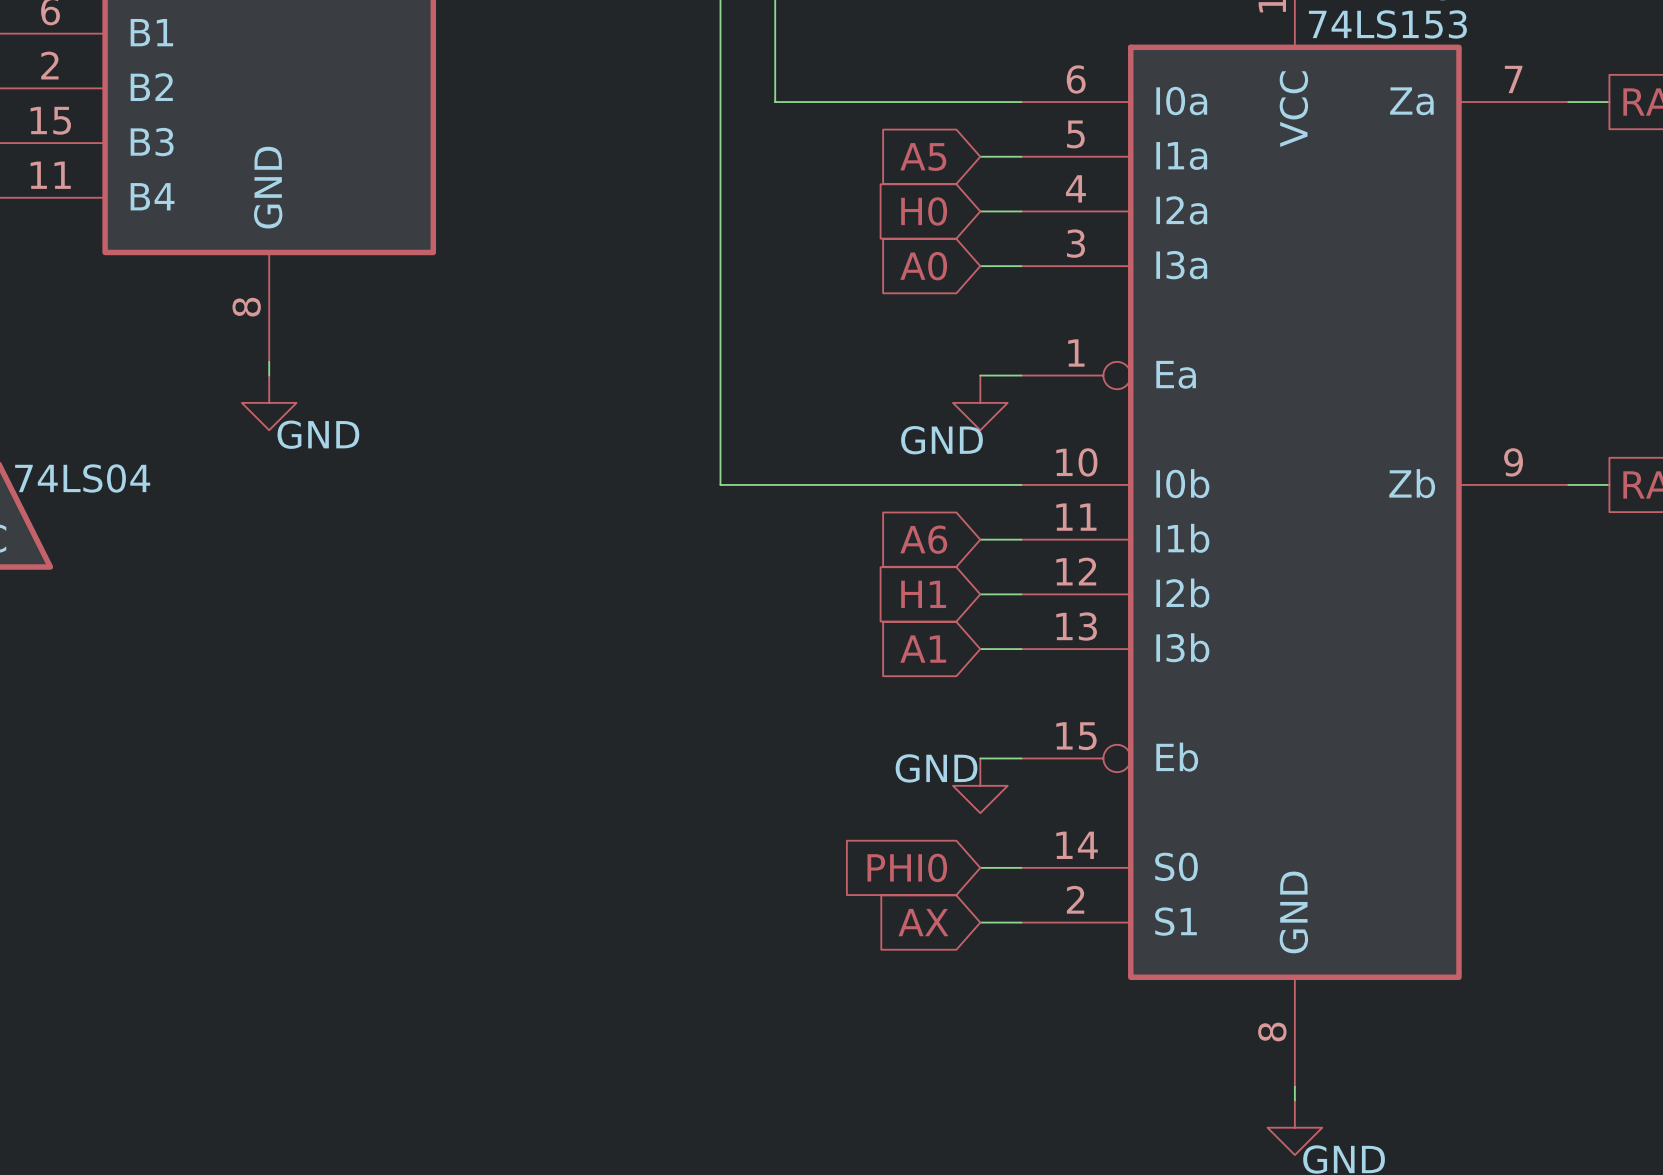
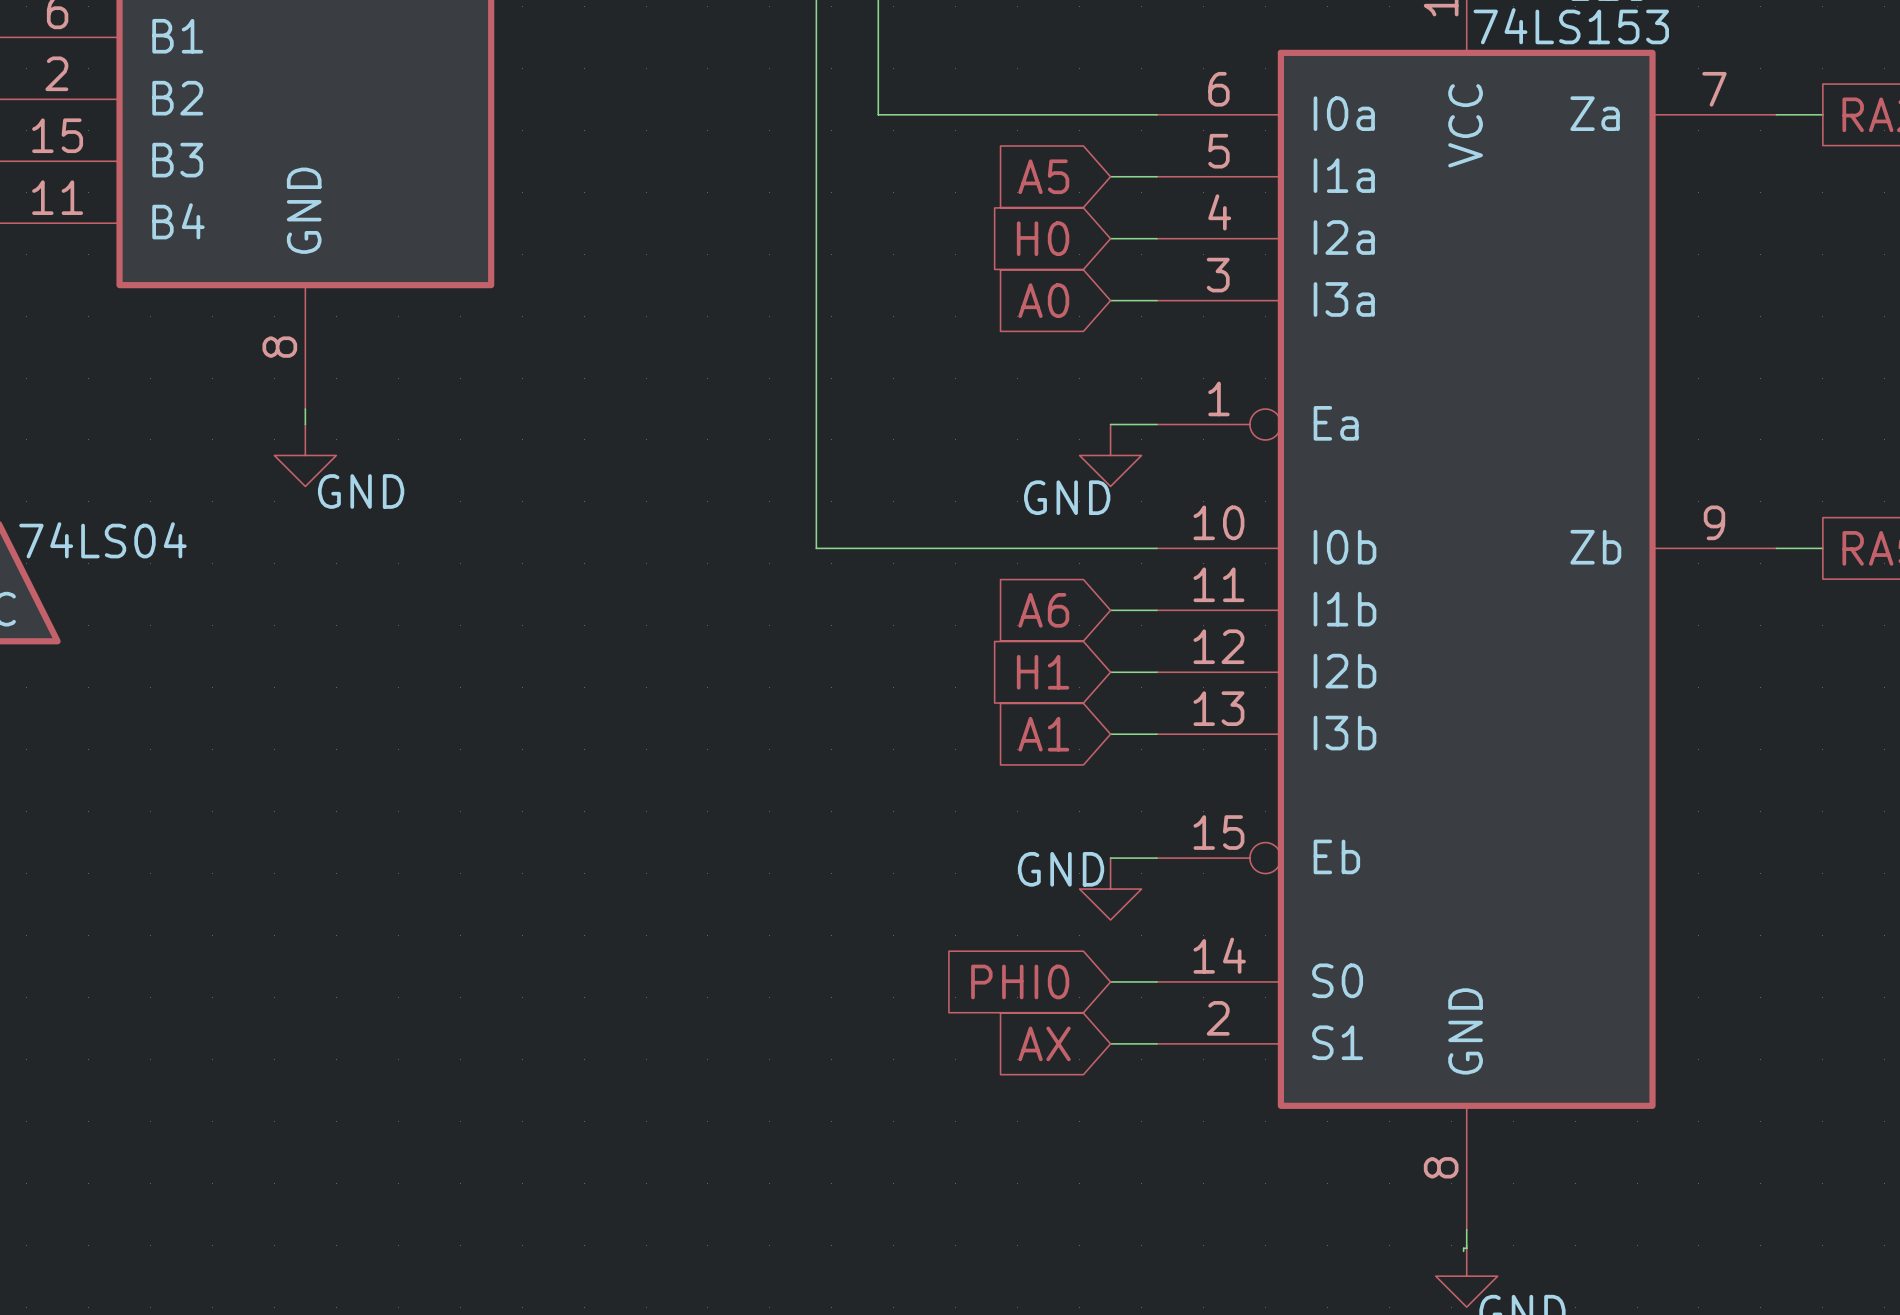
wire: none -> (1466, 1245) (1463, 1251)

